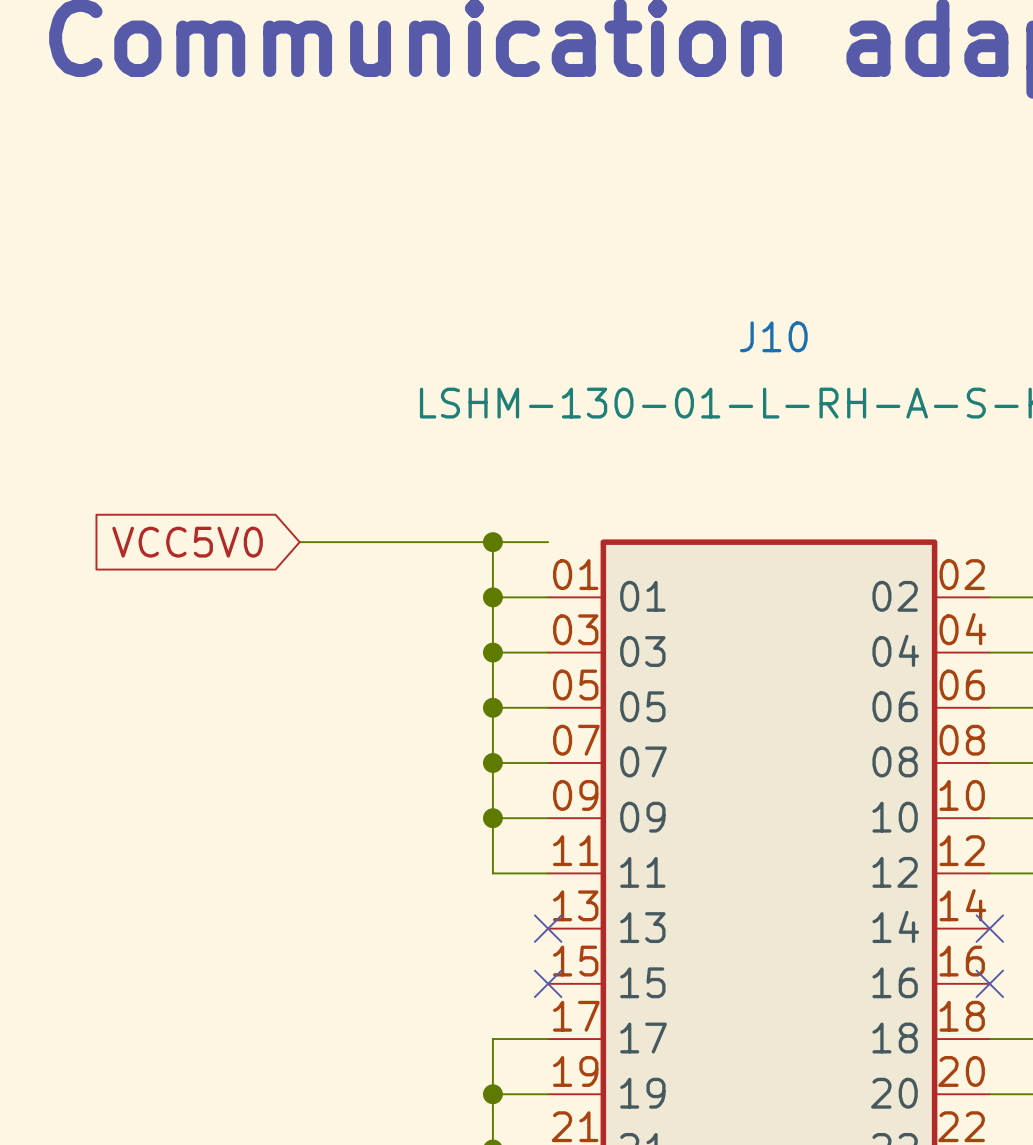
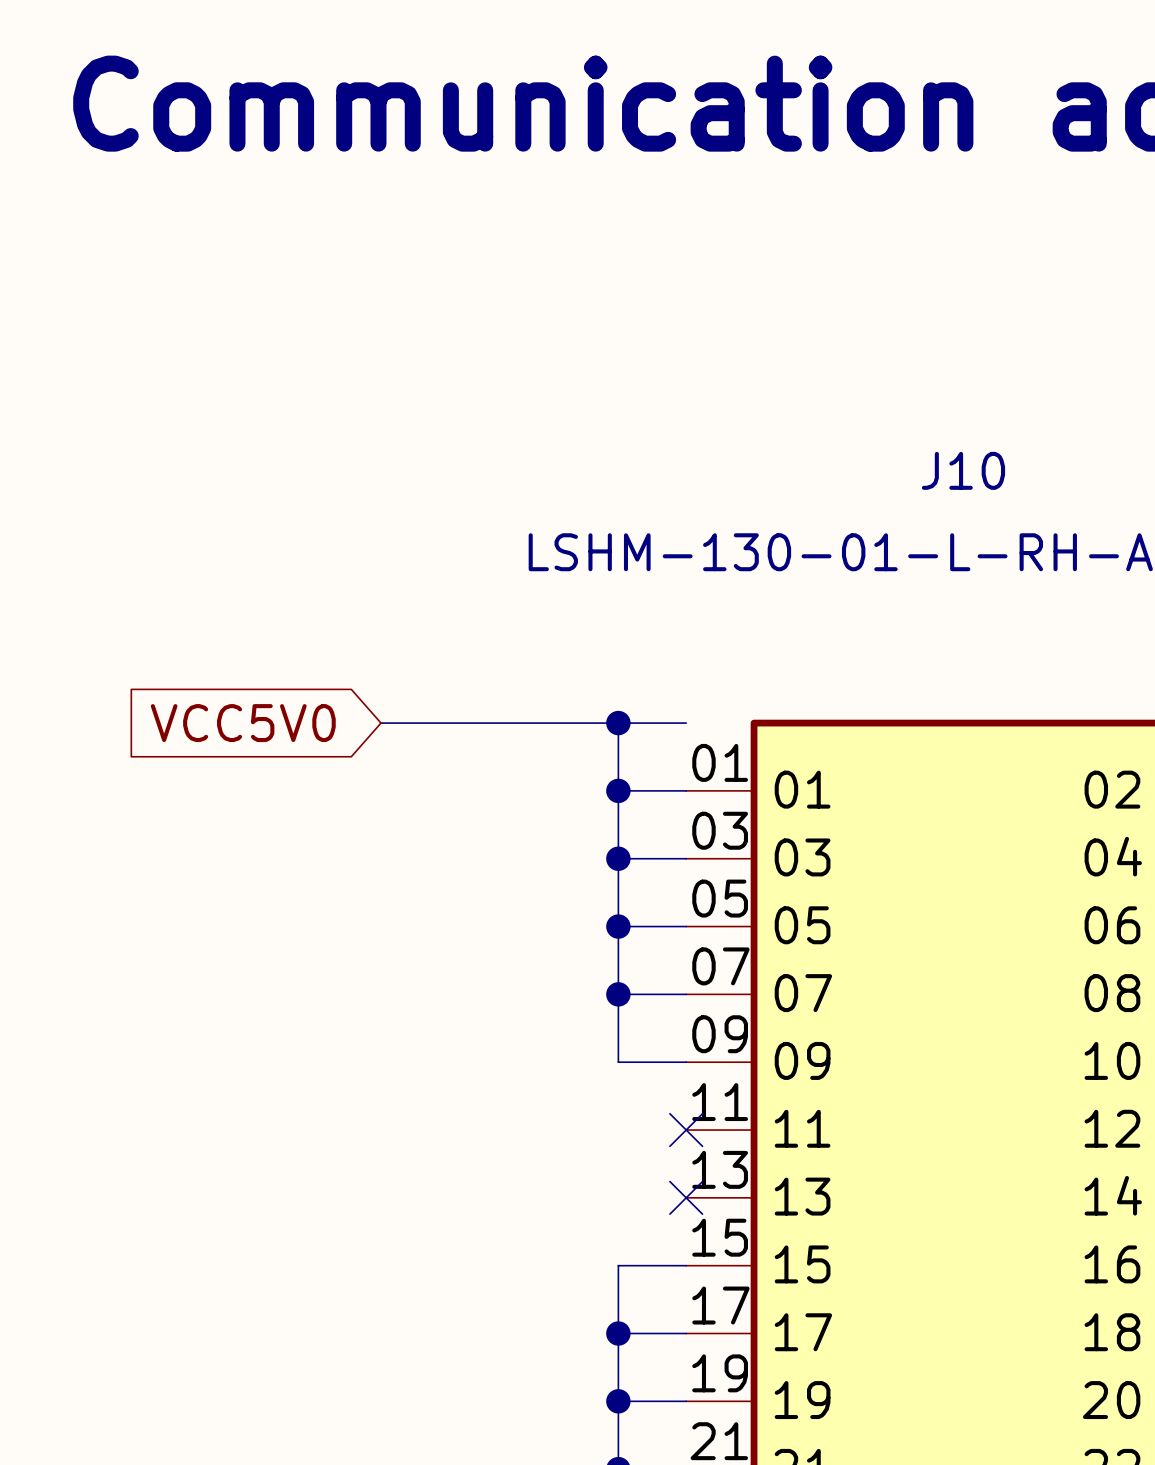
wire: (492, 818) (492, 873) (548, 873) -> none
junction: (492, 818) -> none
wire: none -> (686, 1265) (618, 1265) (618, 1333)
no-connect mark position: (548, 983) -> (686, 1130)
junction: none -> (618, 1333)

